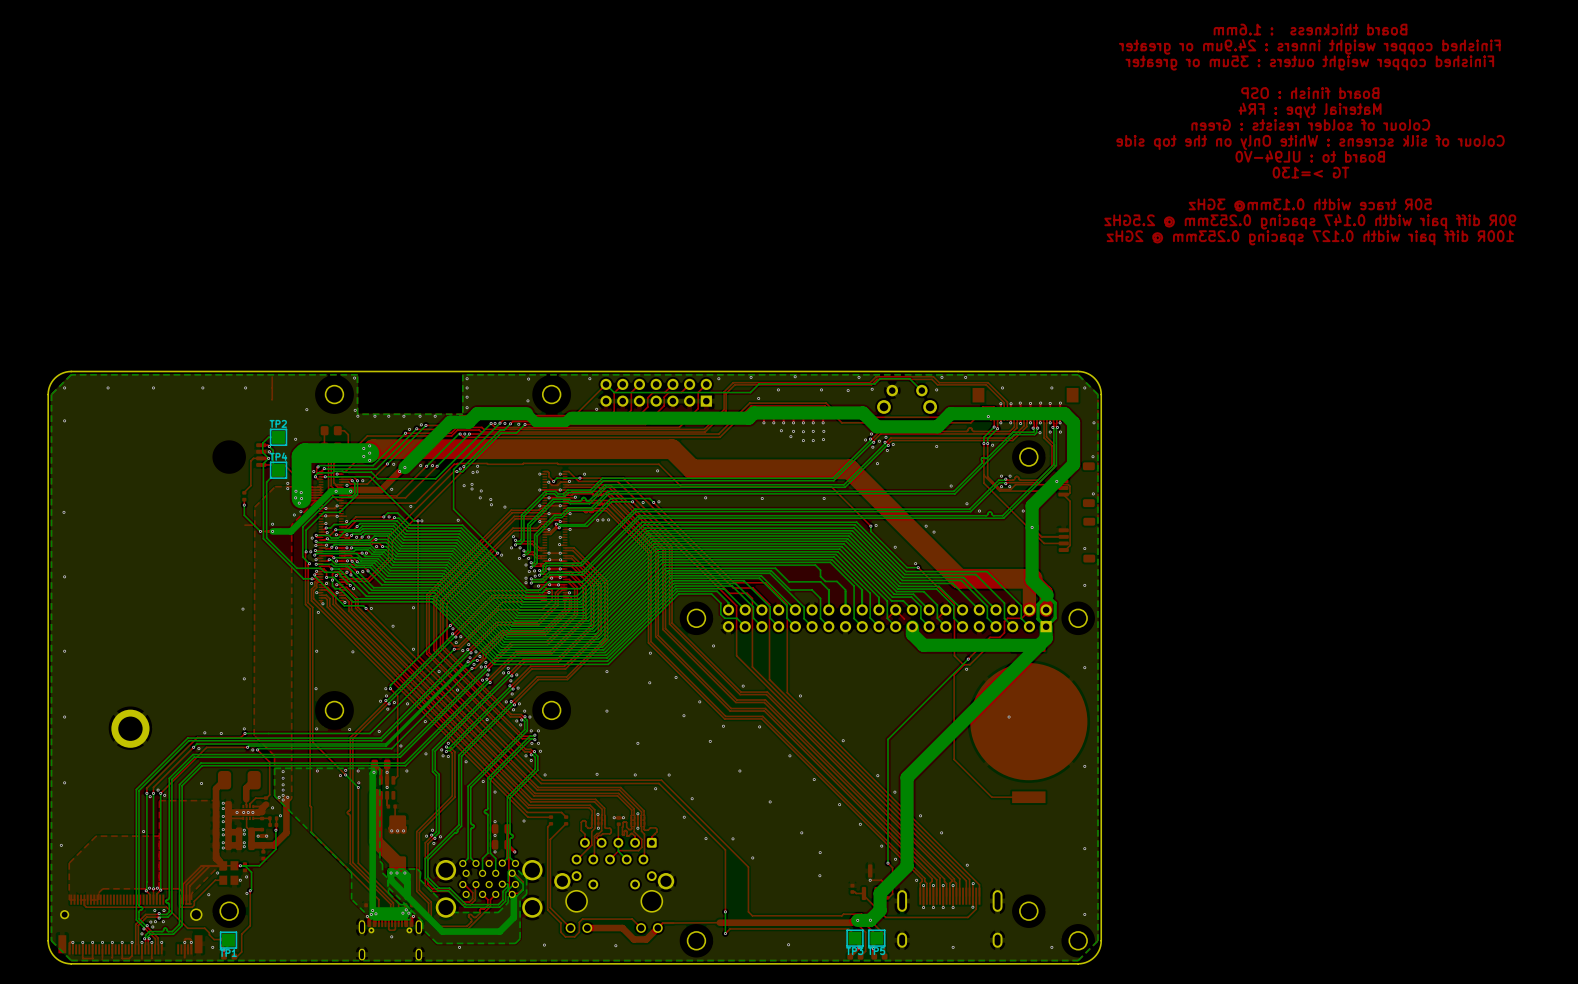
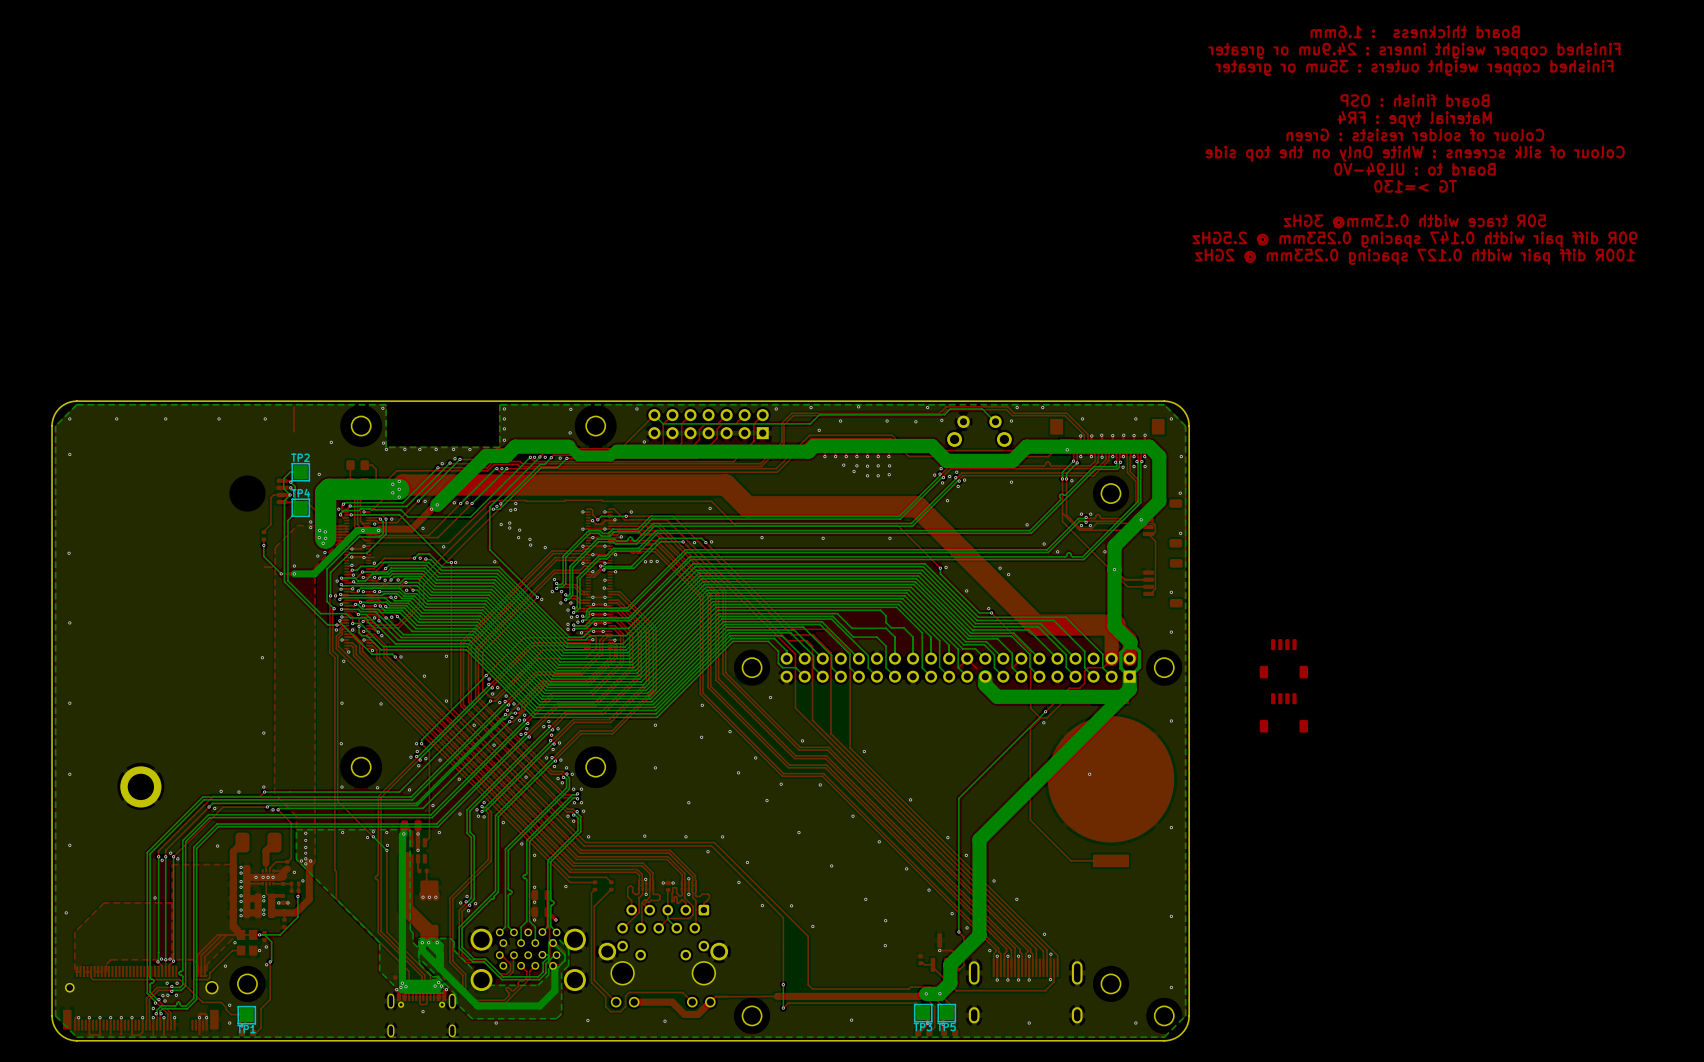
part: none -> (1283, 658)
part: none -> (1283, 712)

